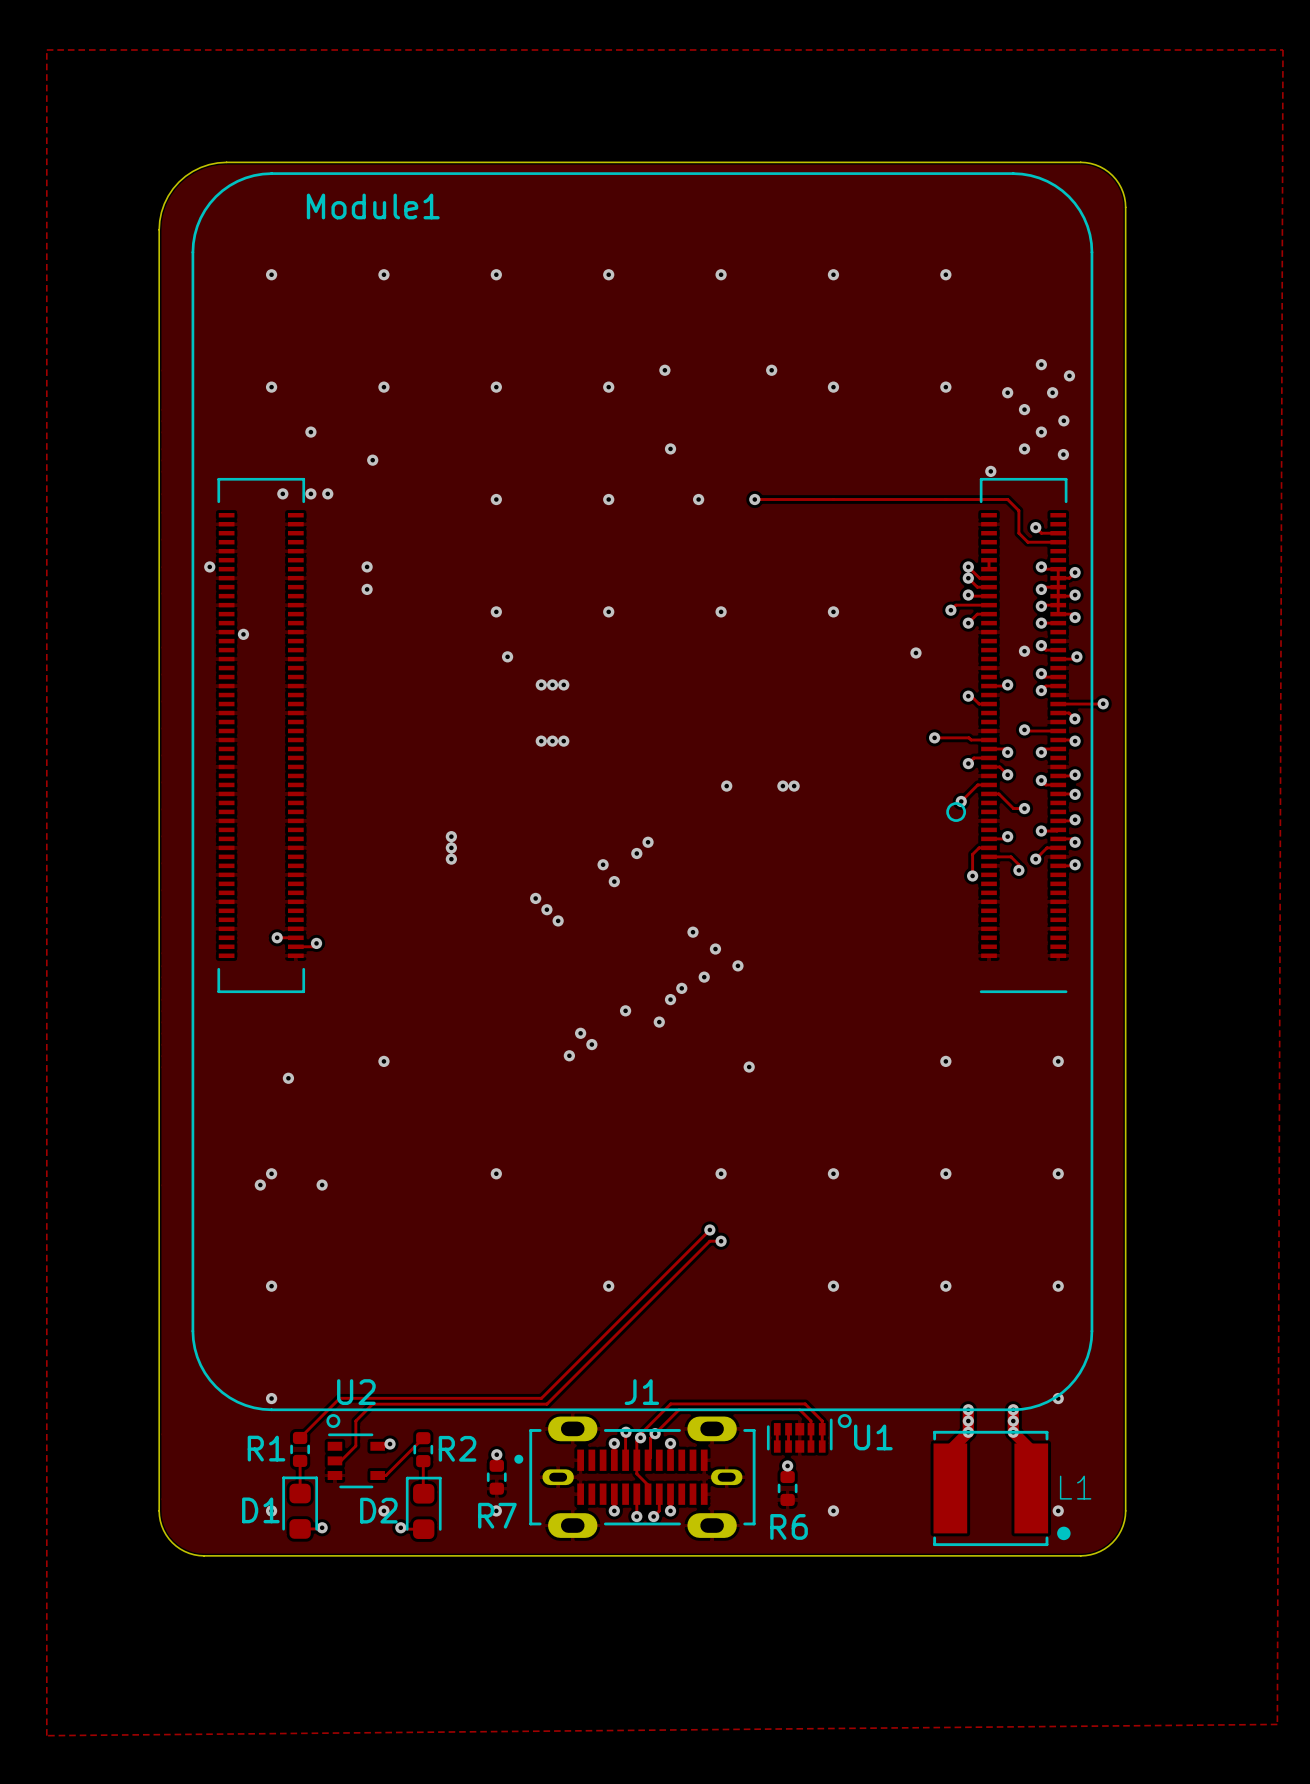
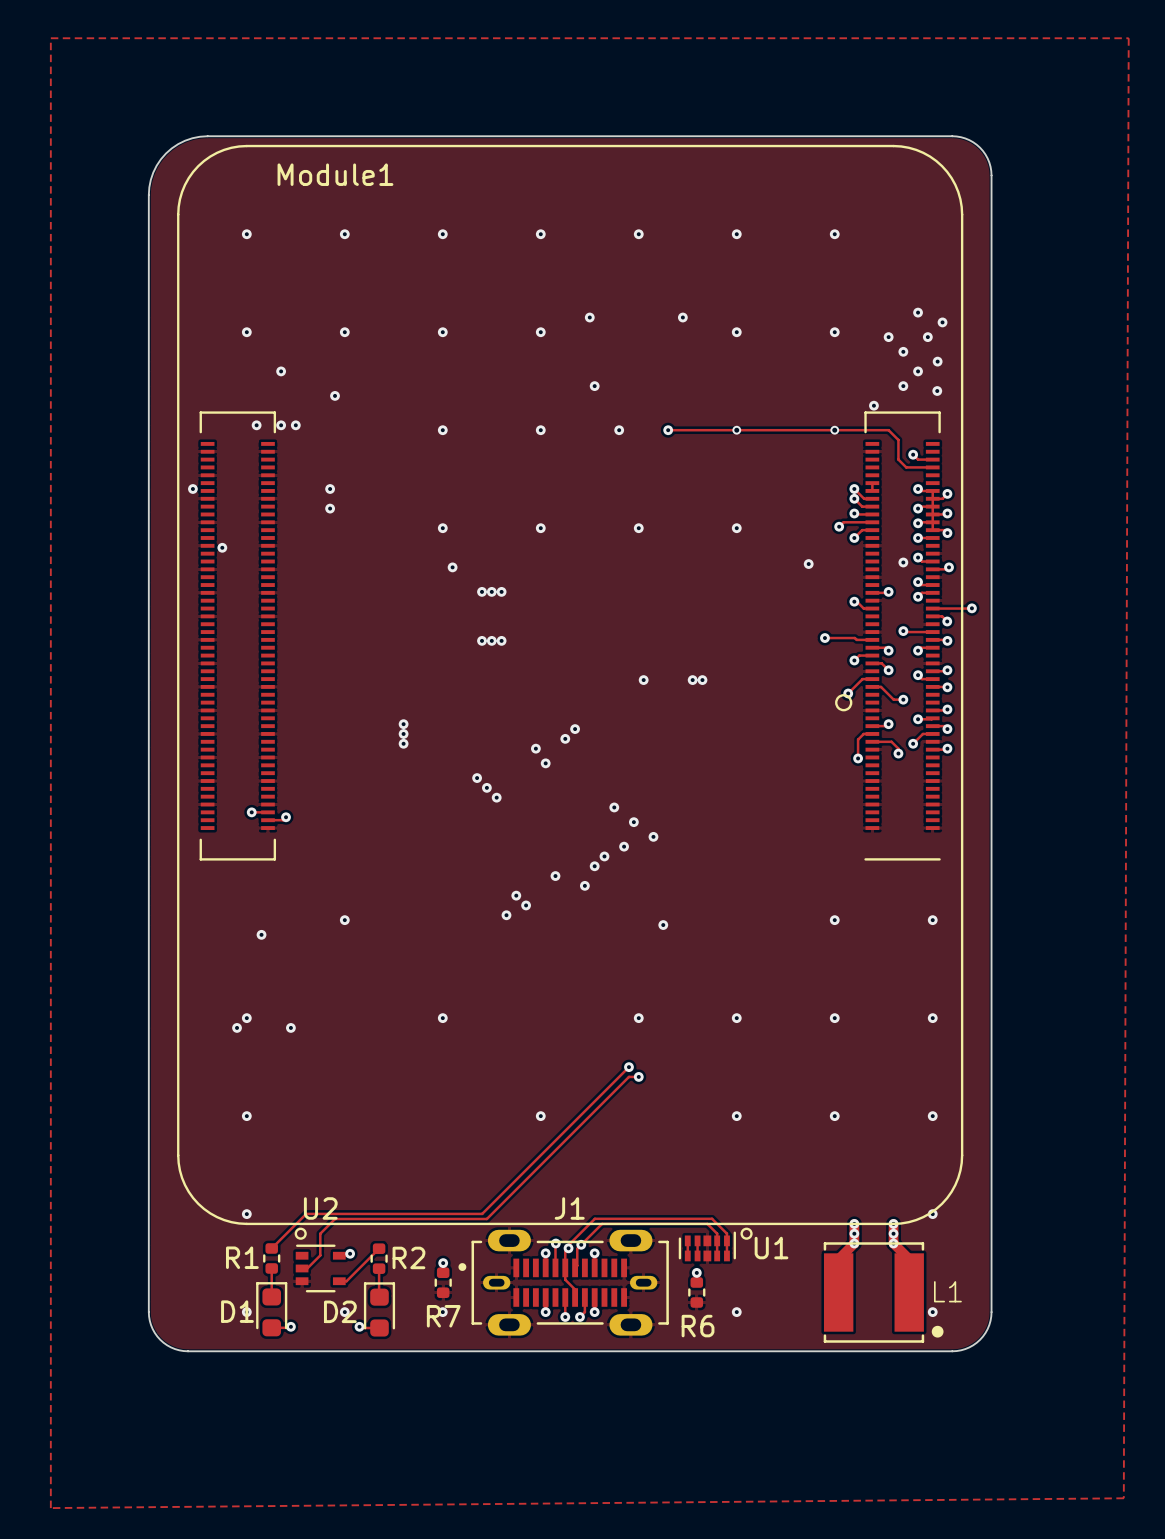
via: none -> (736, 430)
via: none -> (834, 430)

